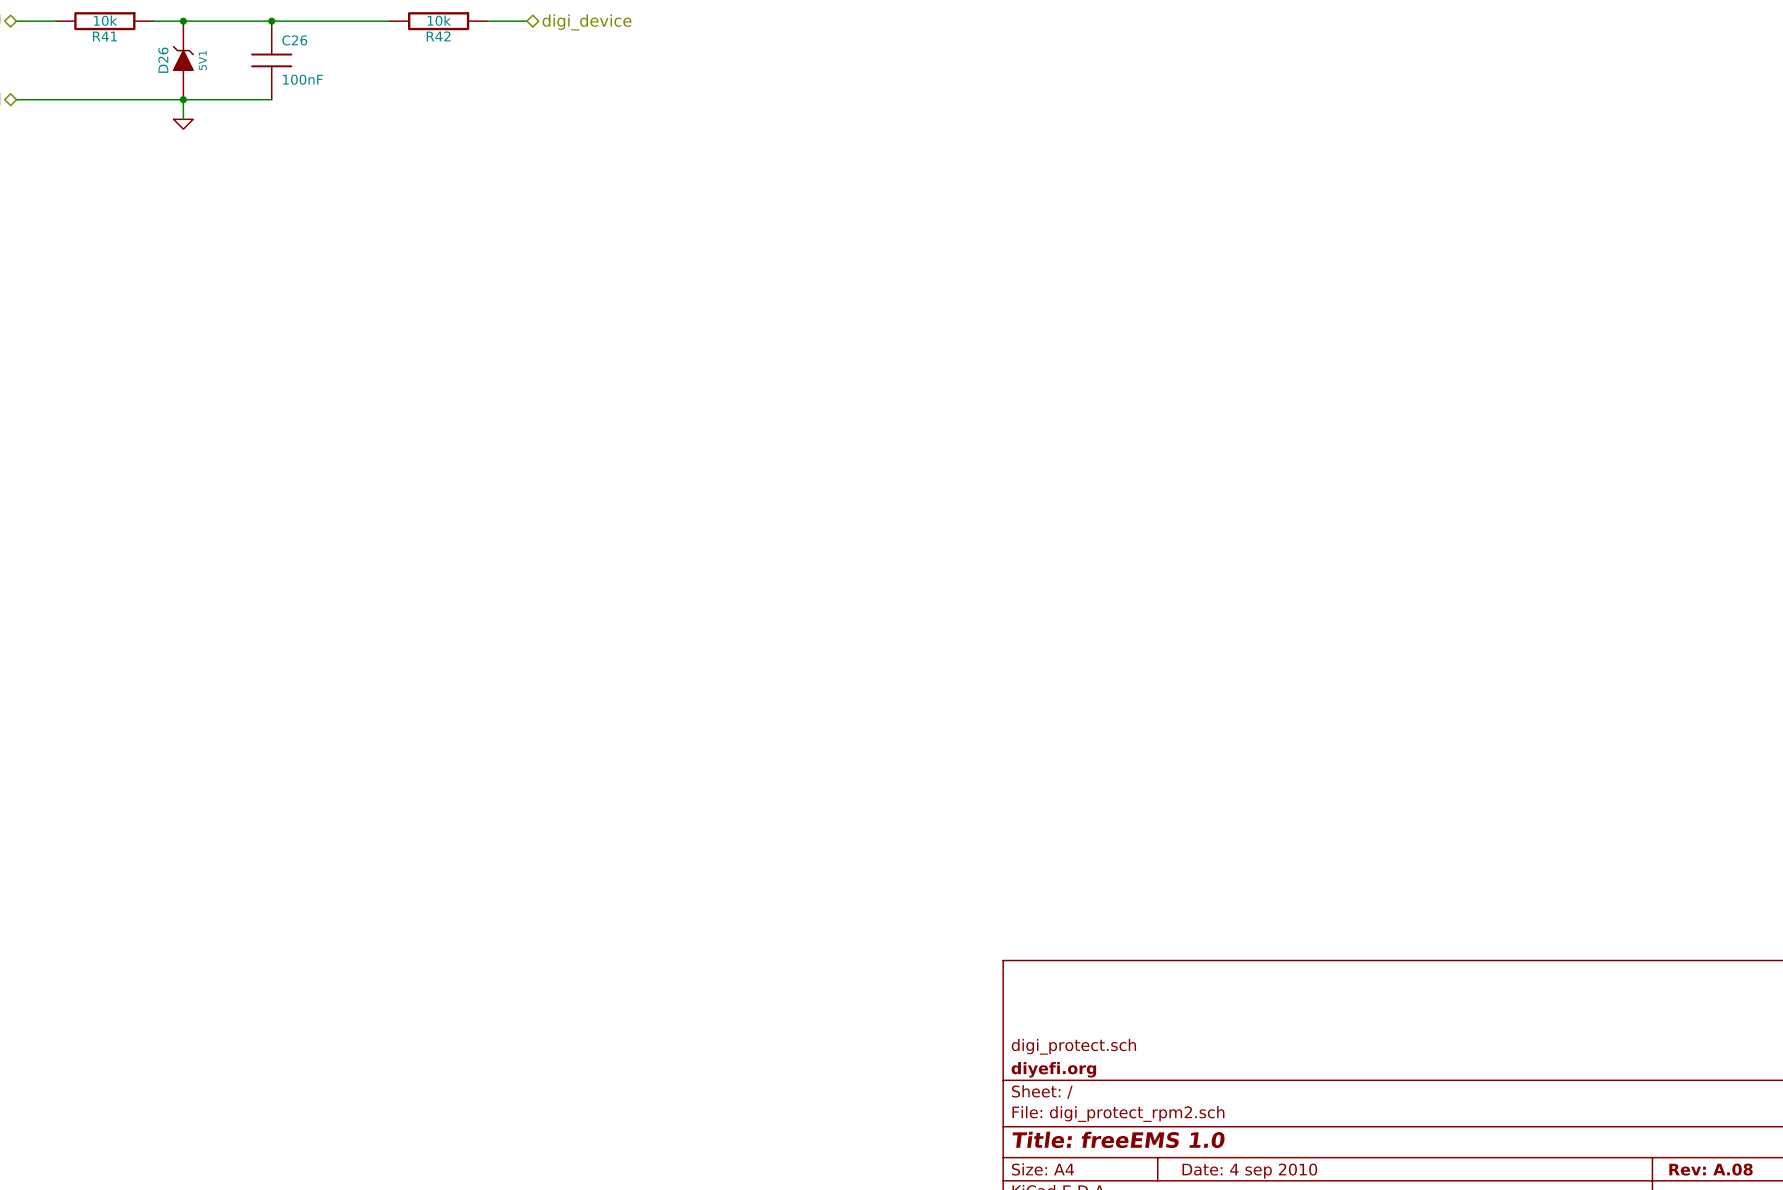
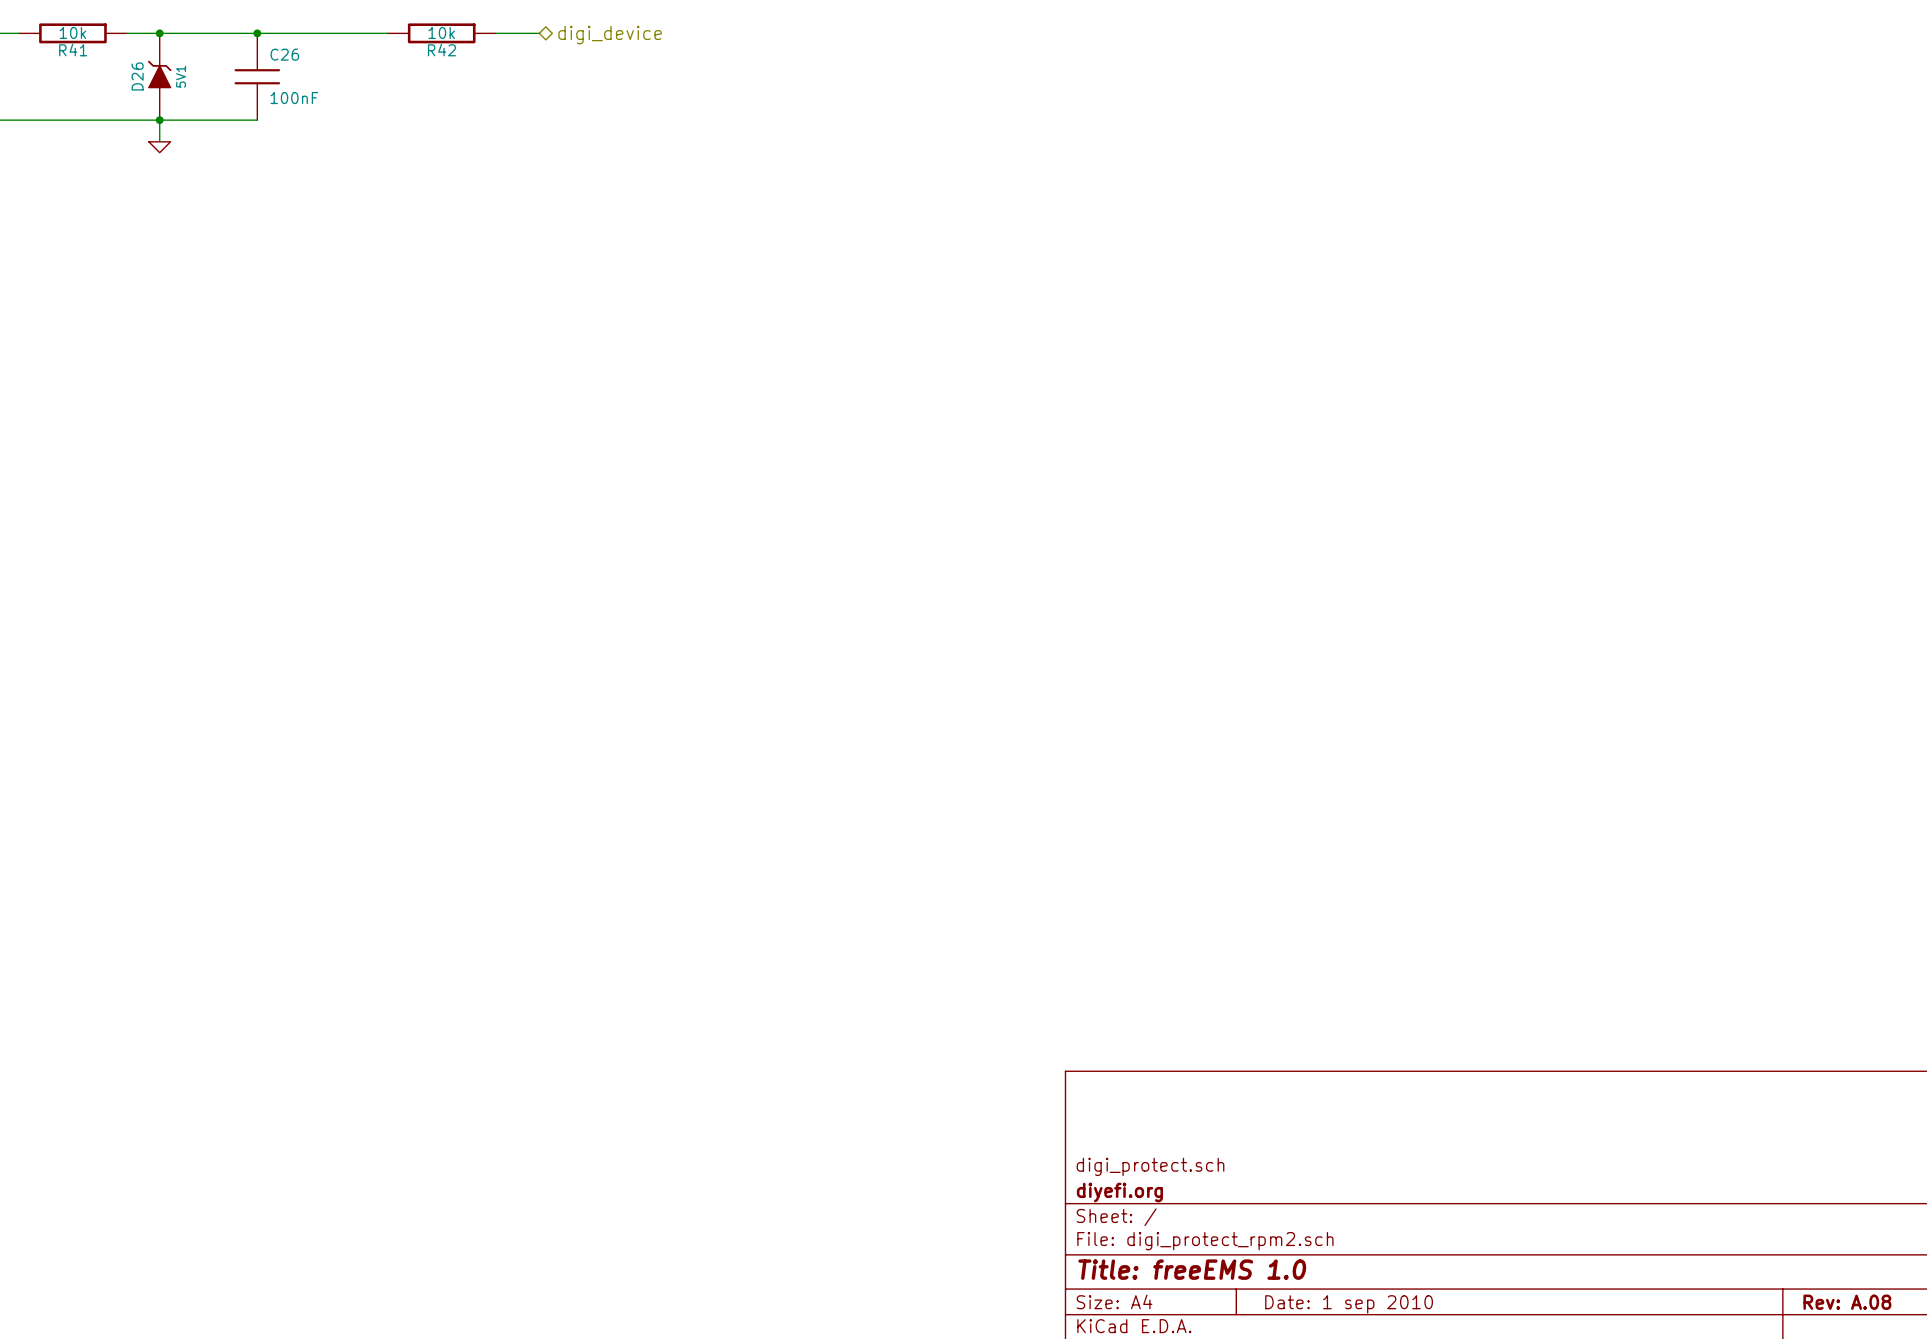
title block: Date: 4 sep 2010 (1249, 1171) -> Date: 1 sep 2010 (1349, 1304)

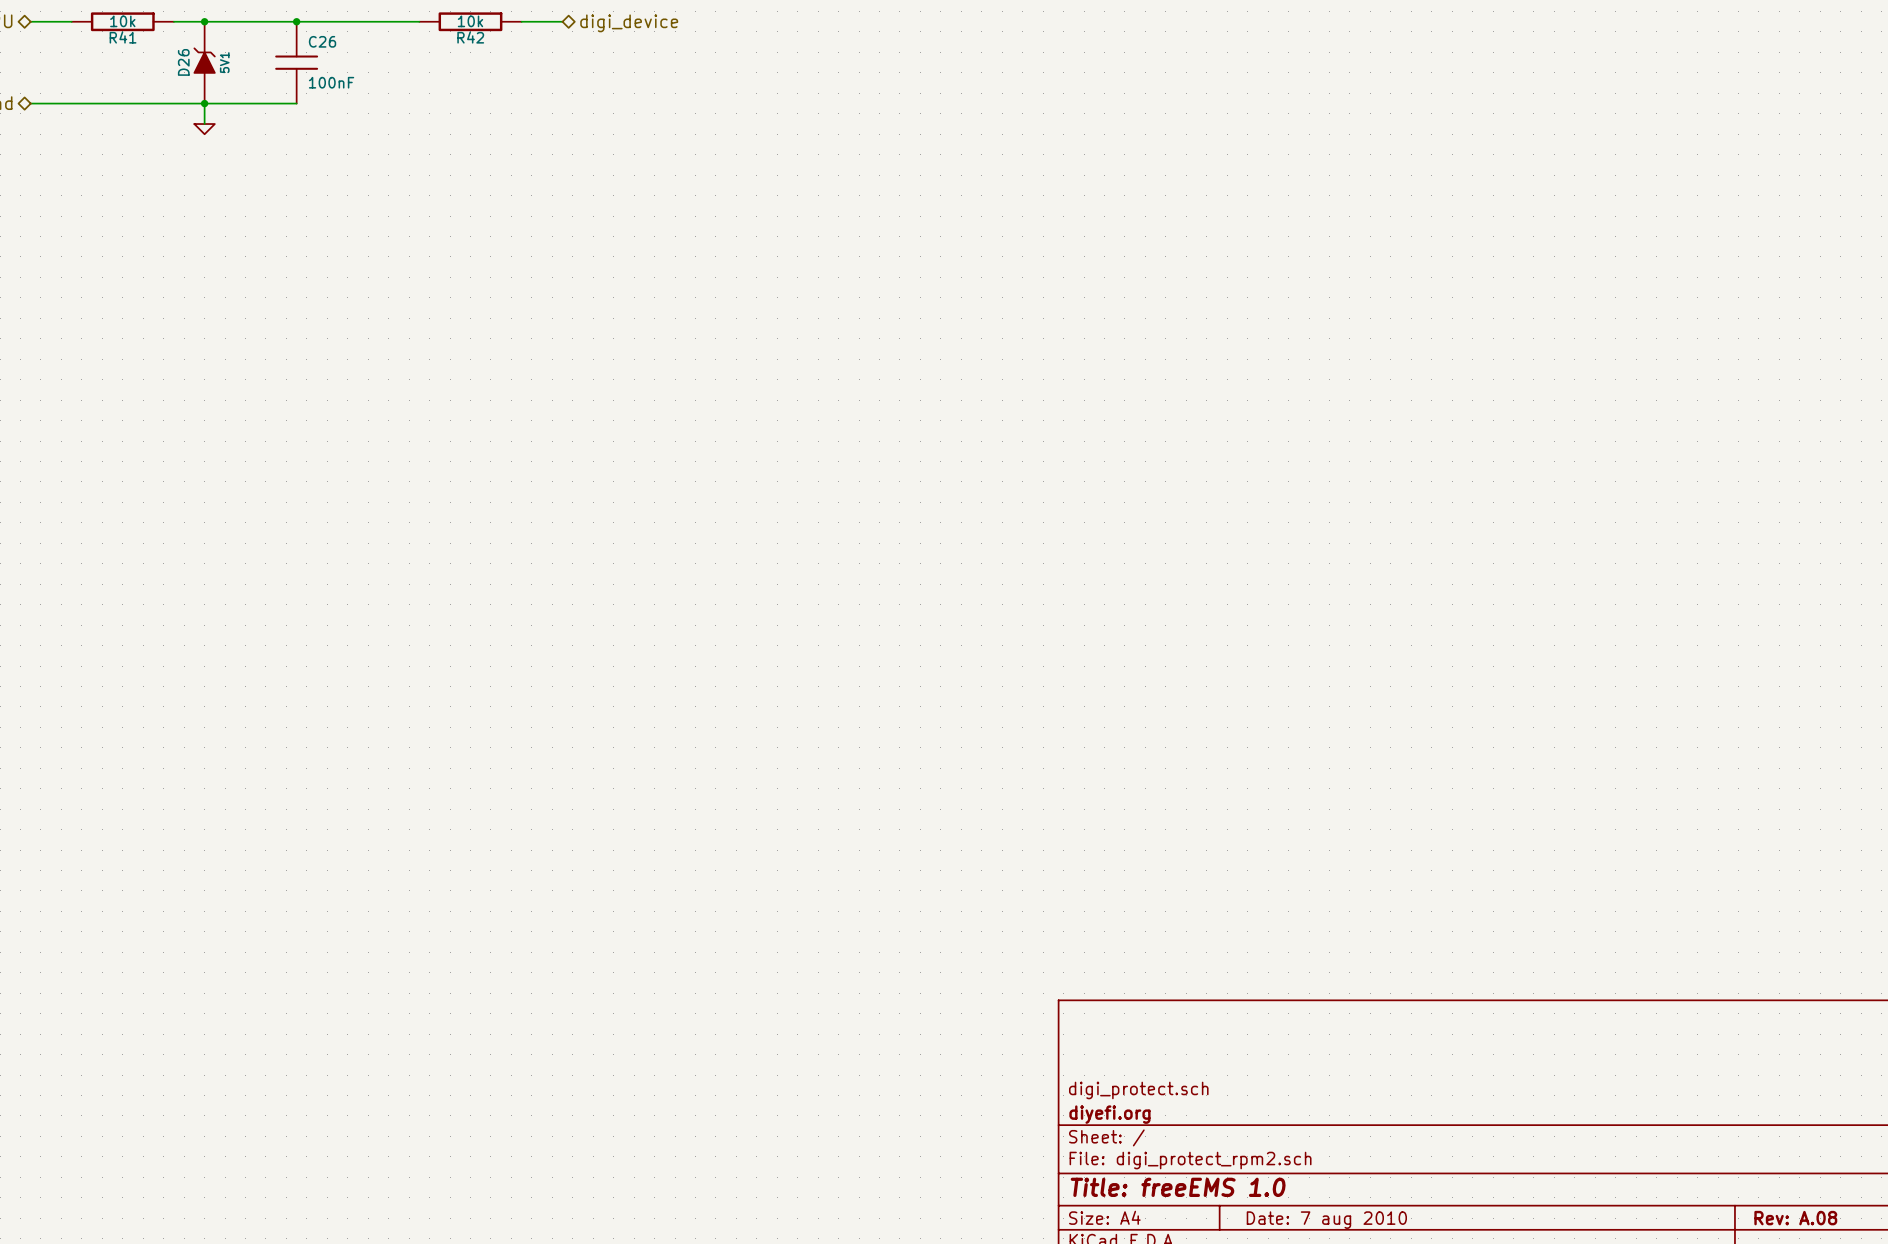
title block: Date: 1 sep 2010 (1349, 1304) -> Date: 7 aug 2010 (1326, 1220)

